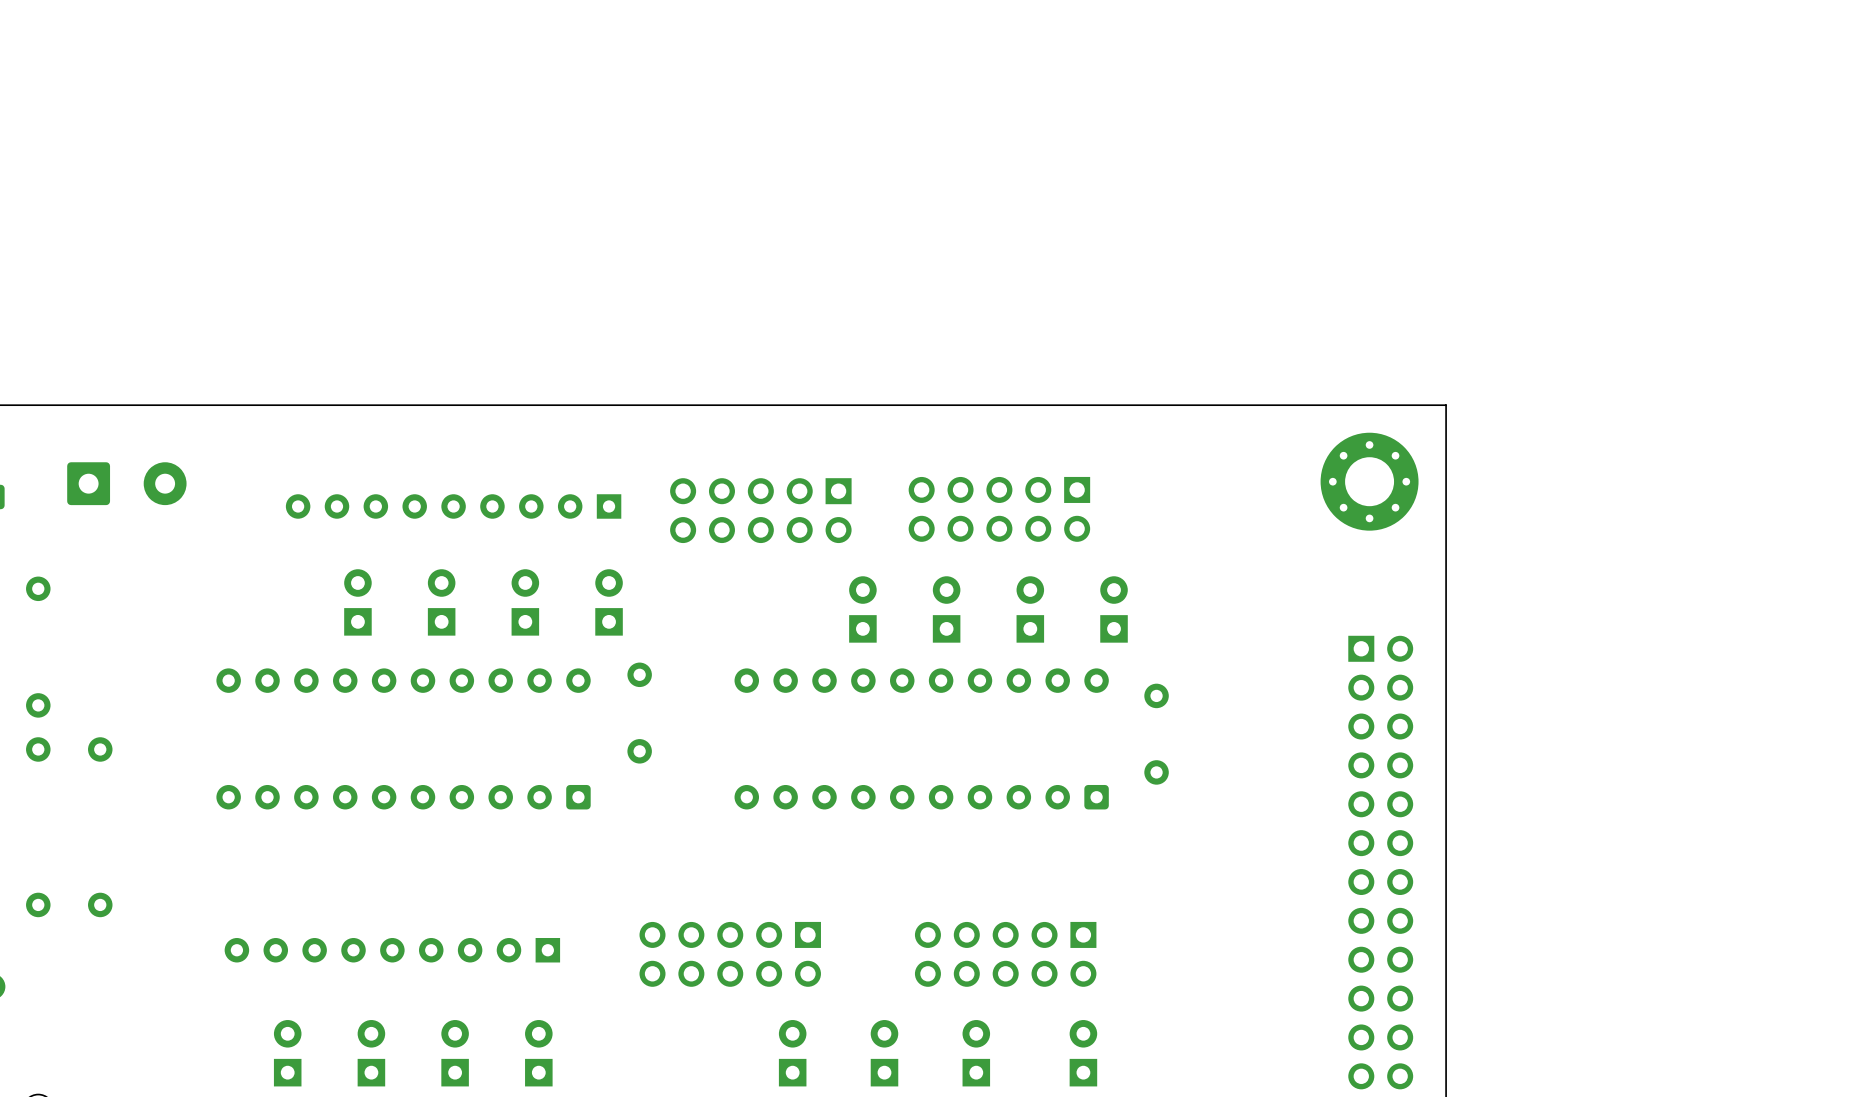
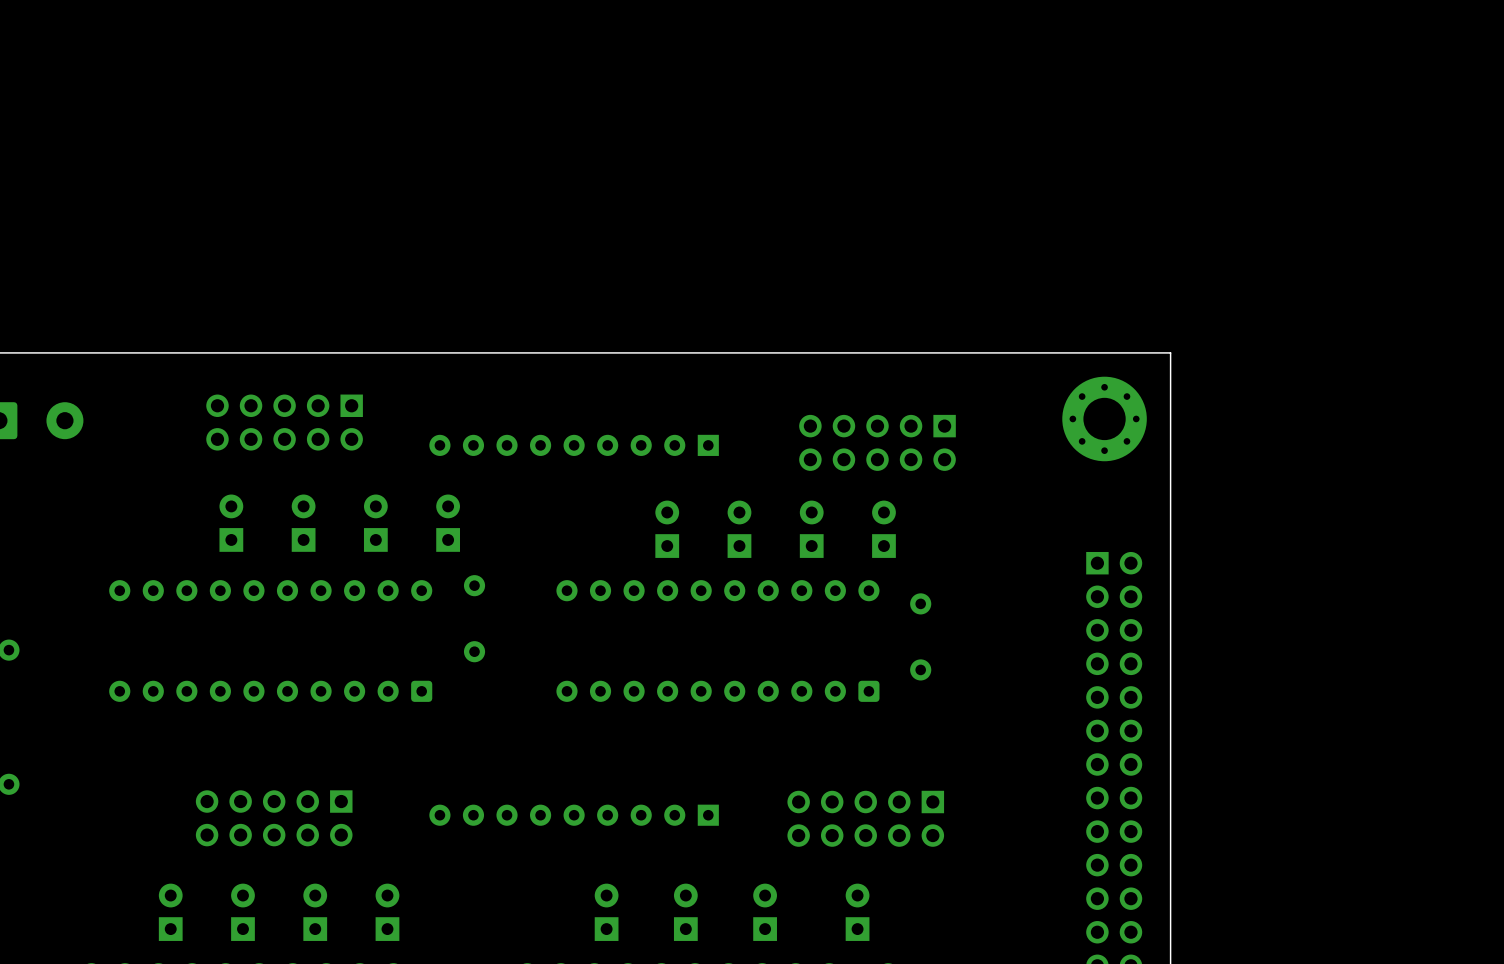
part footprint: [670, 478, 852, 544] -> [429, 434, 719, 456]
part: none -> (284, 422)
part: (453, 506) -> none
part position: (999, 509) -> (877, 442)
part: none -> (574, 815)
part: none -> (274, 818)
part: (392, 950) -> none
part: (730, 954) -> none
part position: (1005, 954) -> (865, 818)

